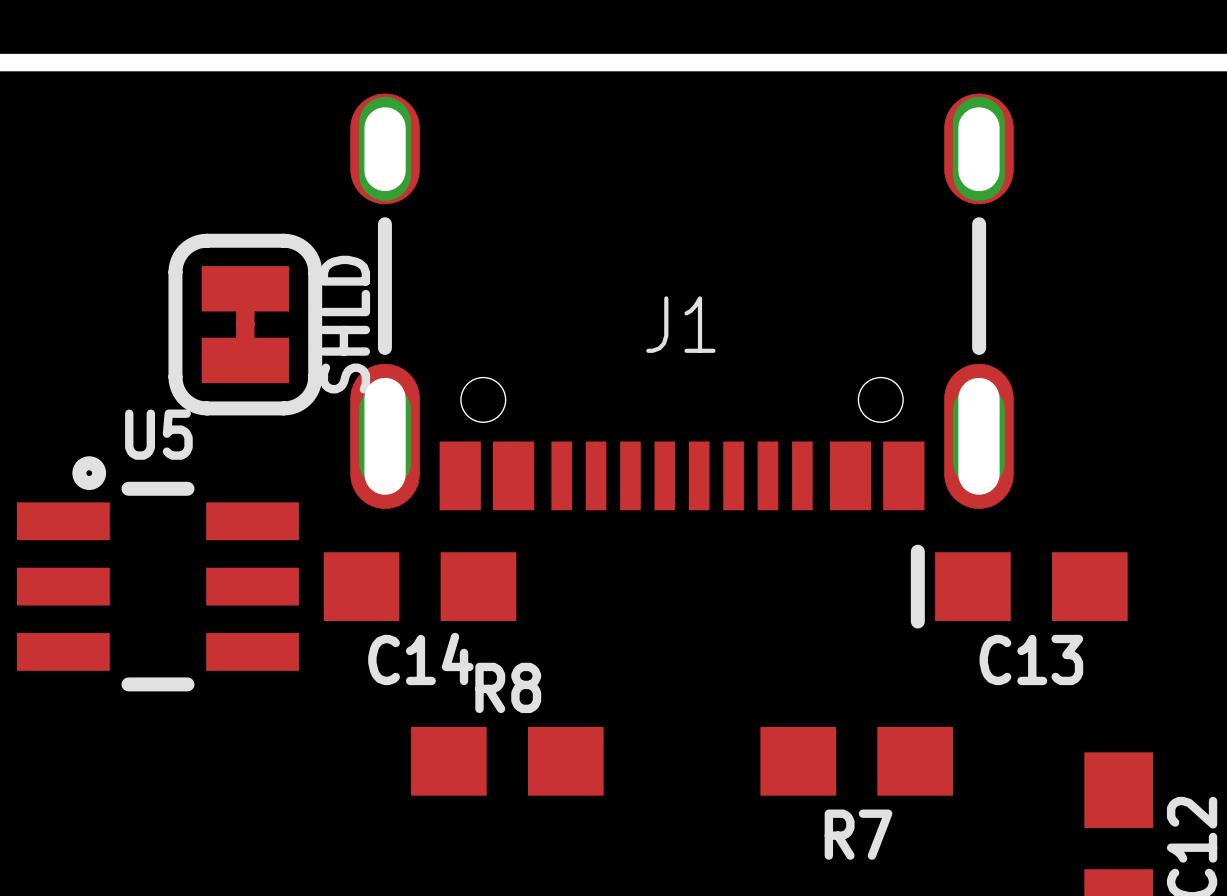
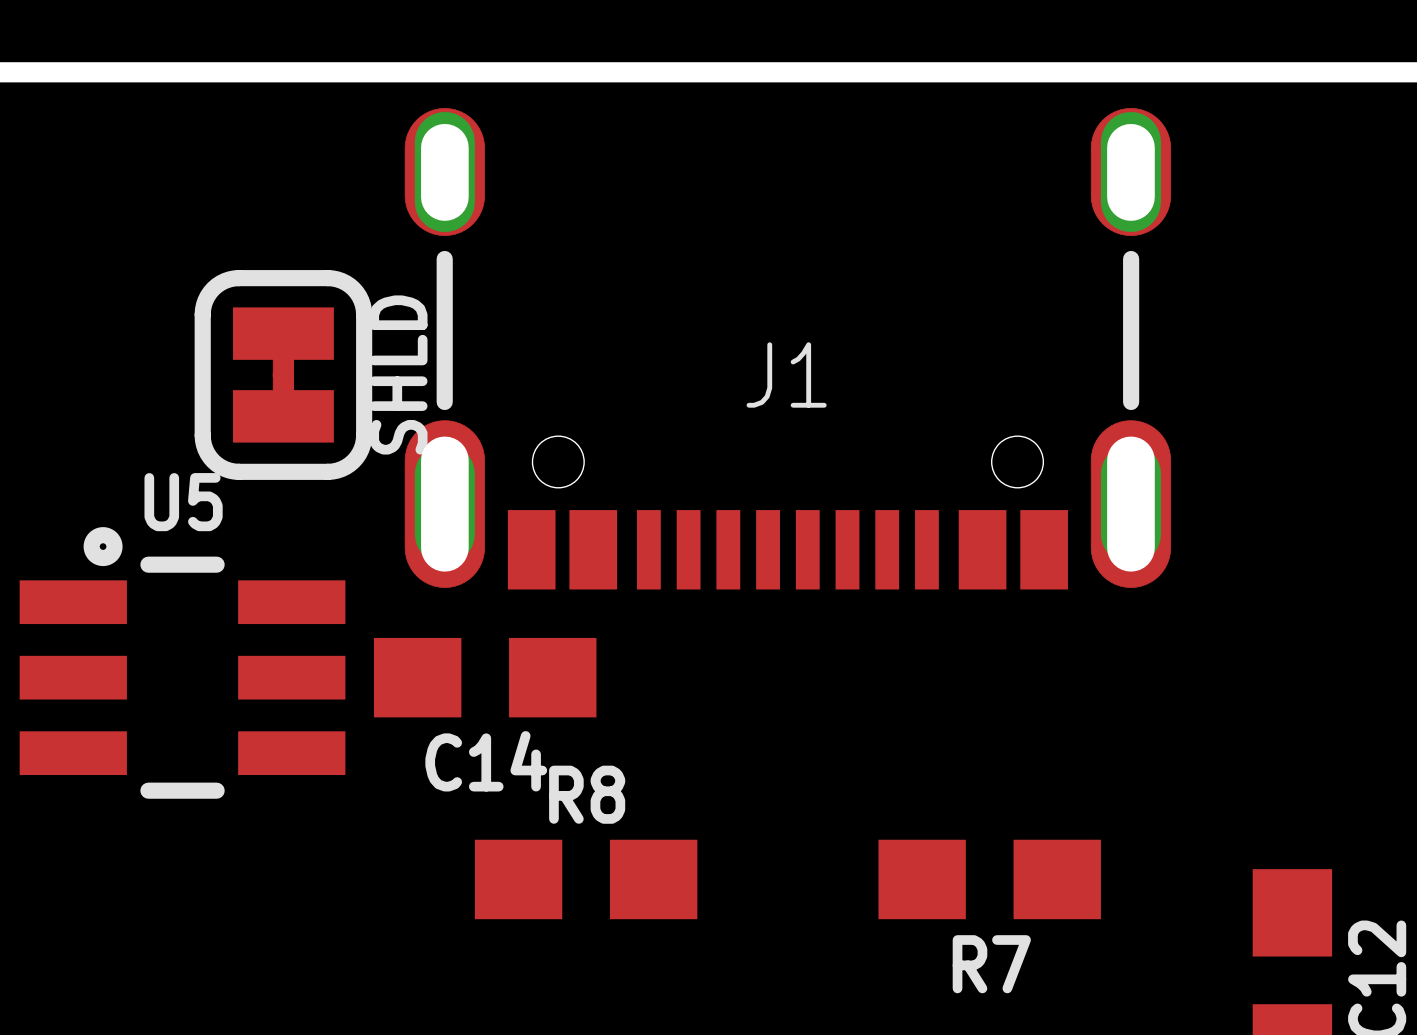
C13: (1019, 586) -> none

